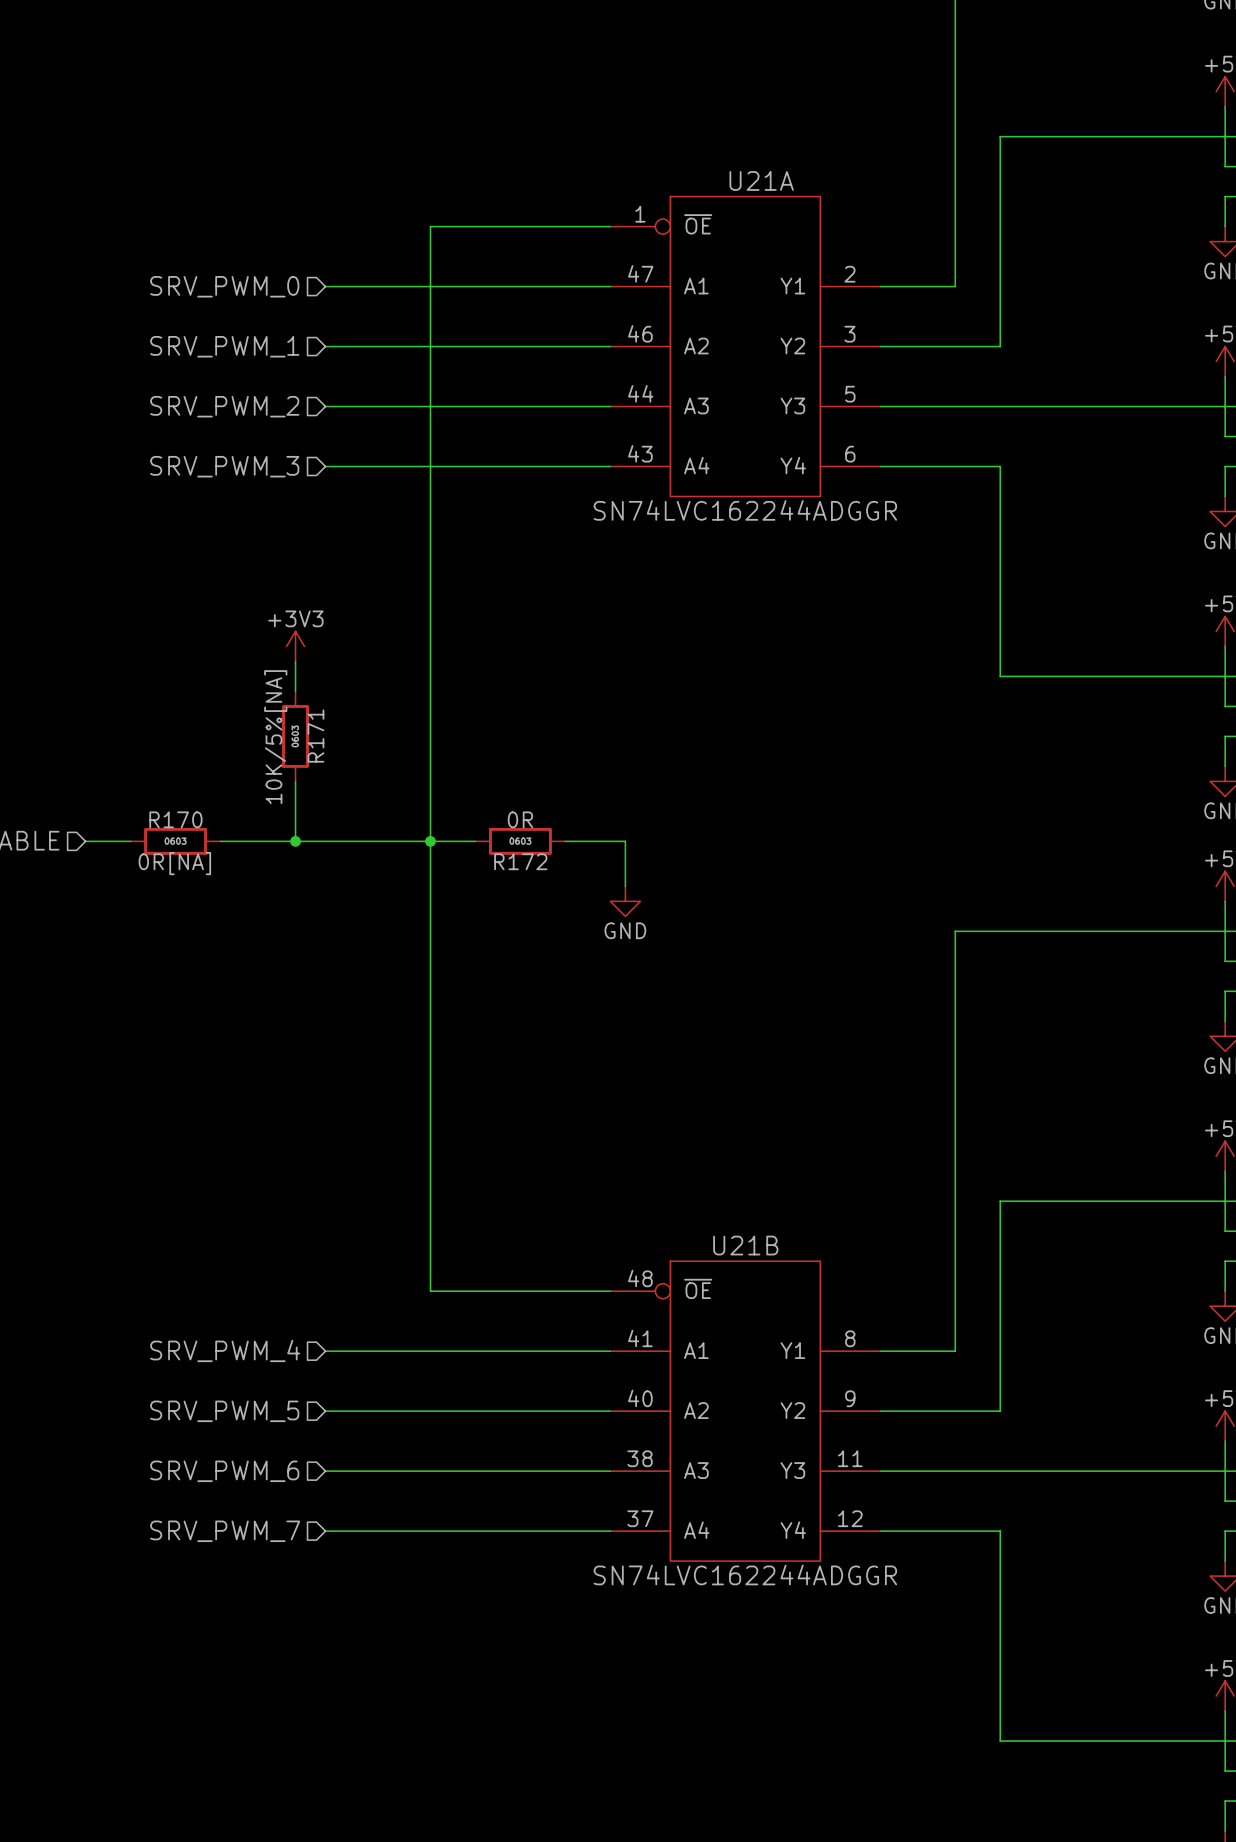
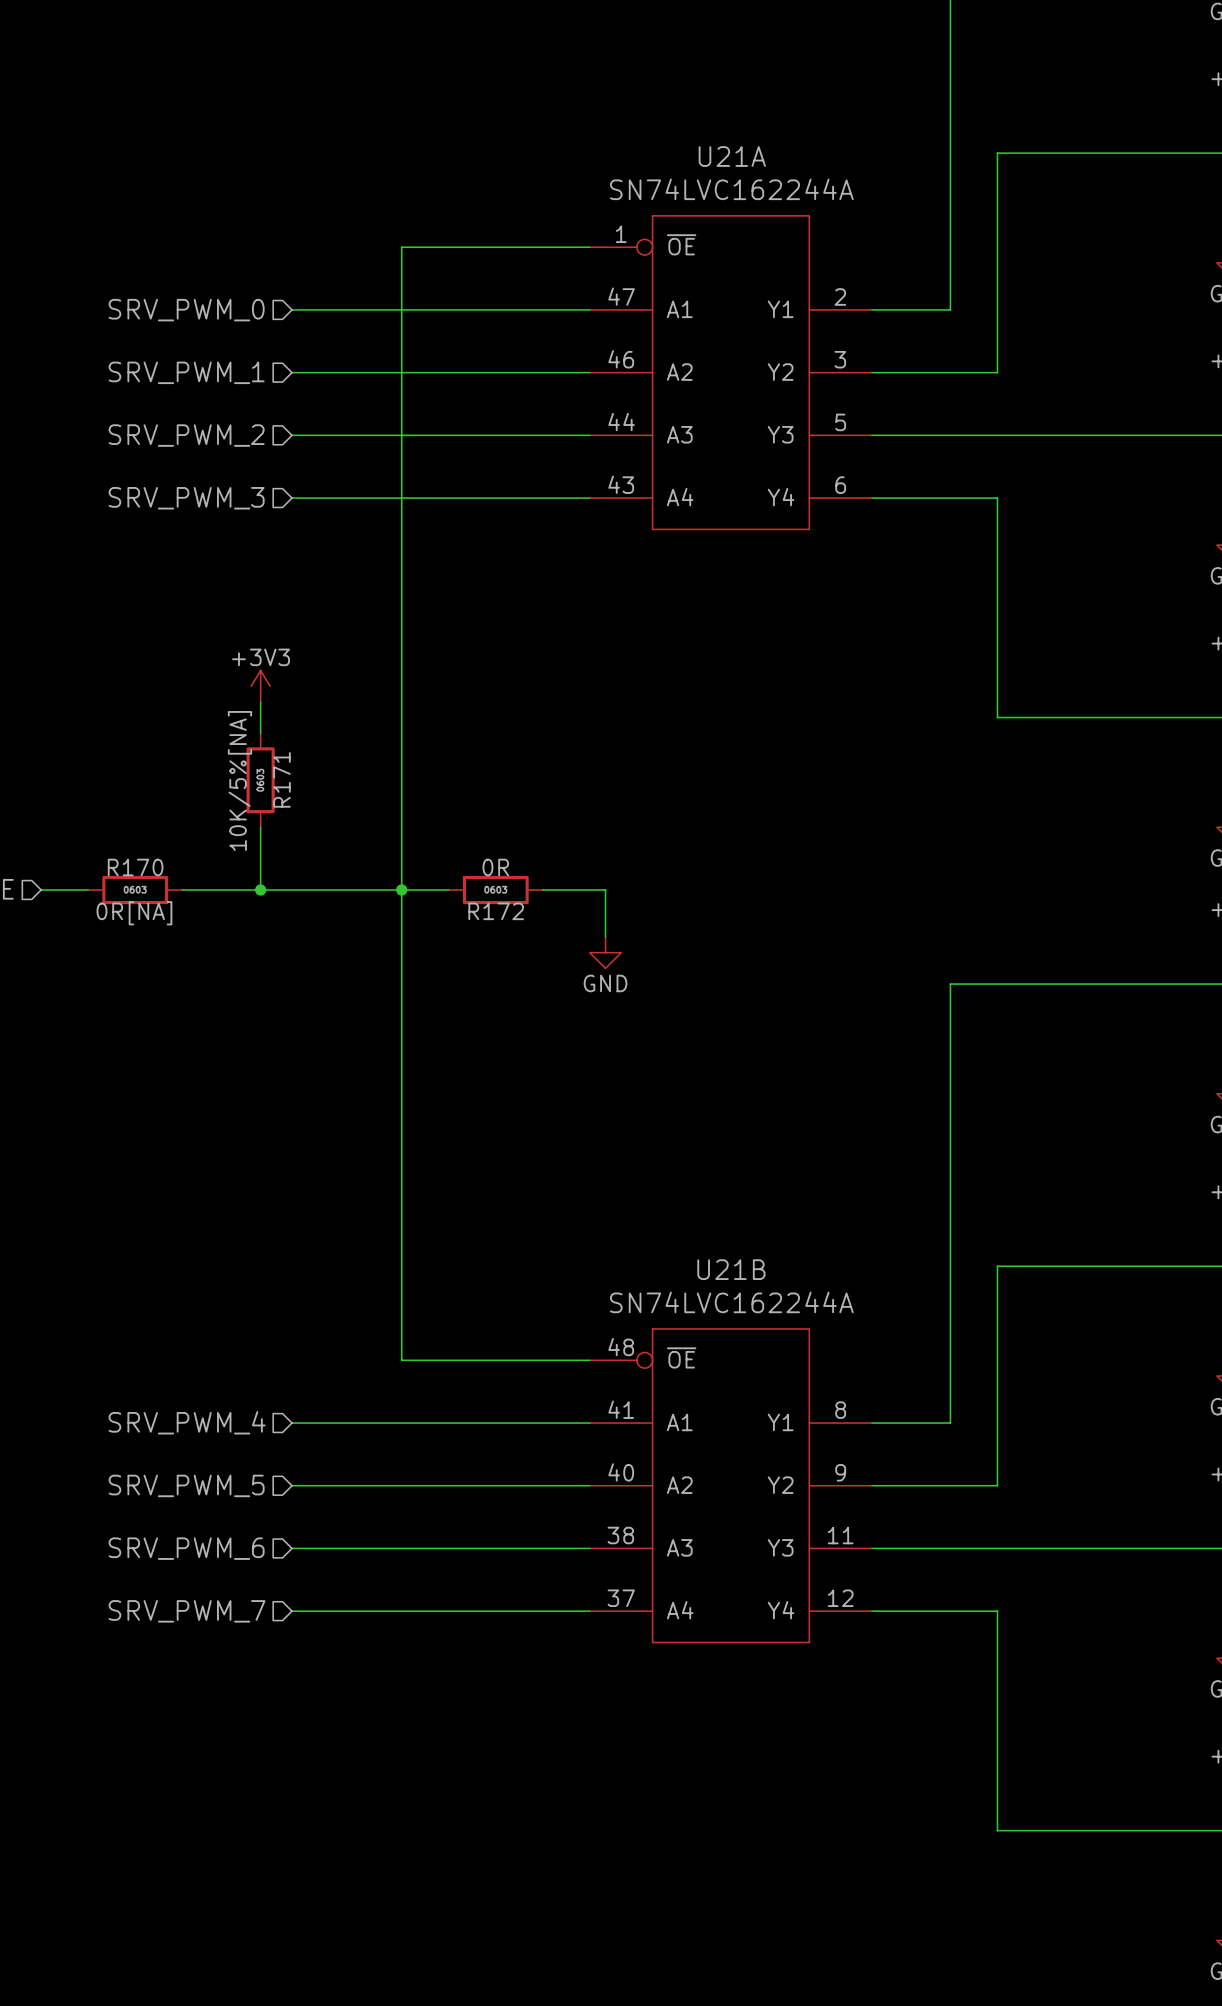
U21A name position: U21A (761, 180) -> U21A (732, 156)
U21A value: SN74LVC162244ADGGR (745, 510) -> SN74LVC162244A (731, 189)
U21B name position: U21B (745, 1245) -> U21B (731, 1269)
U21B value: SN74LVC162244ADGGR (745, 1574) -> SN74LVC162244A (731, 1302)

